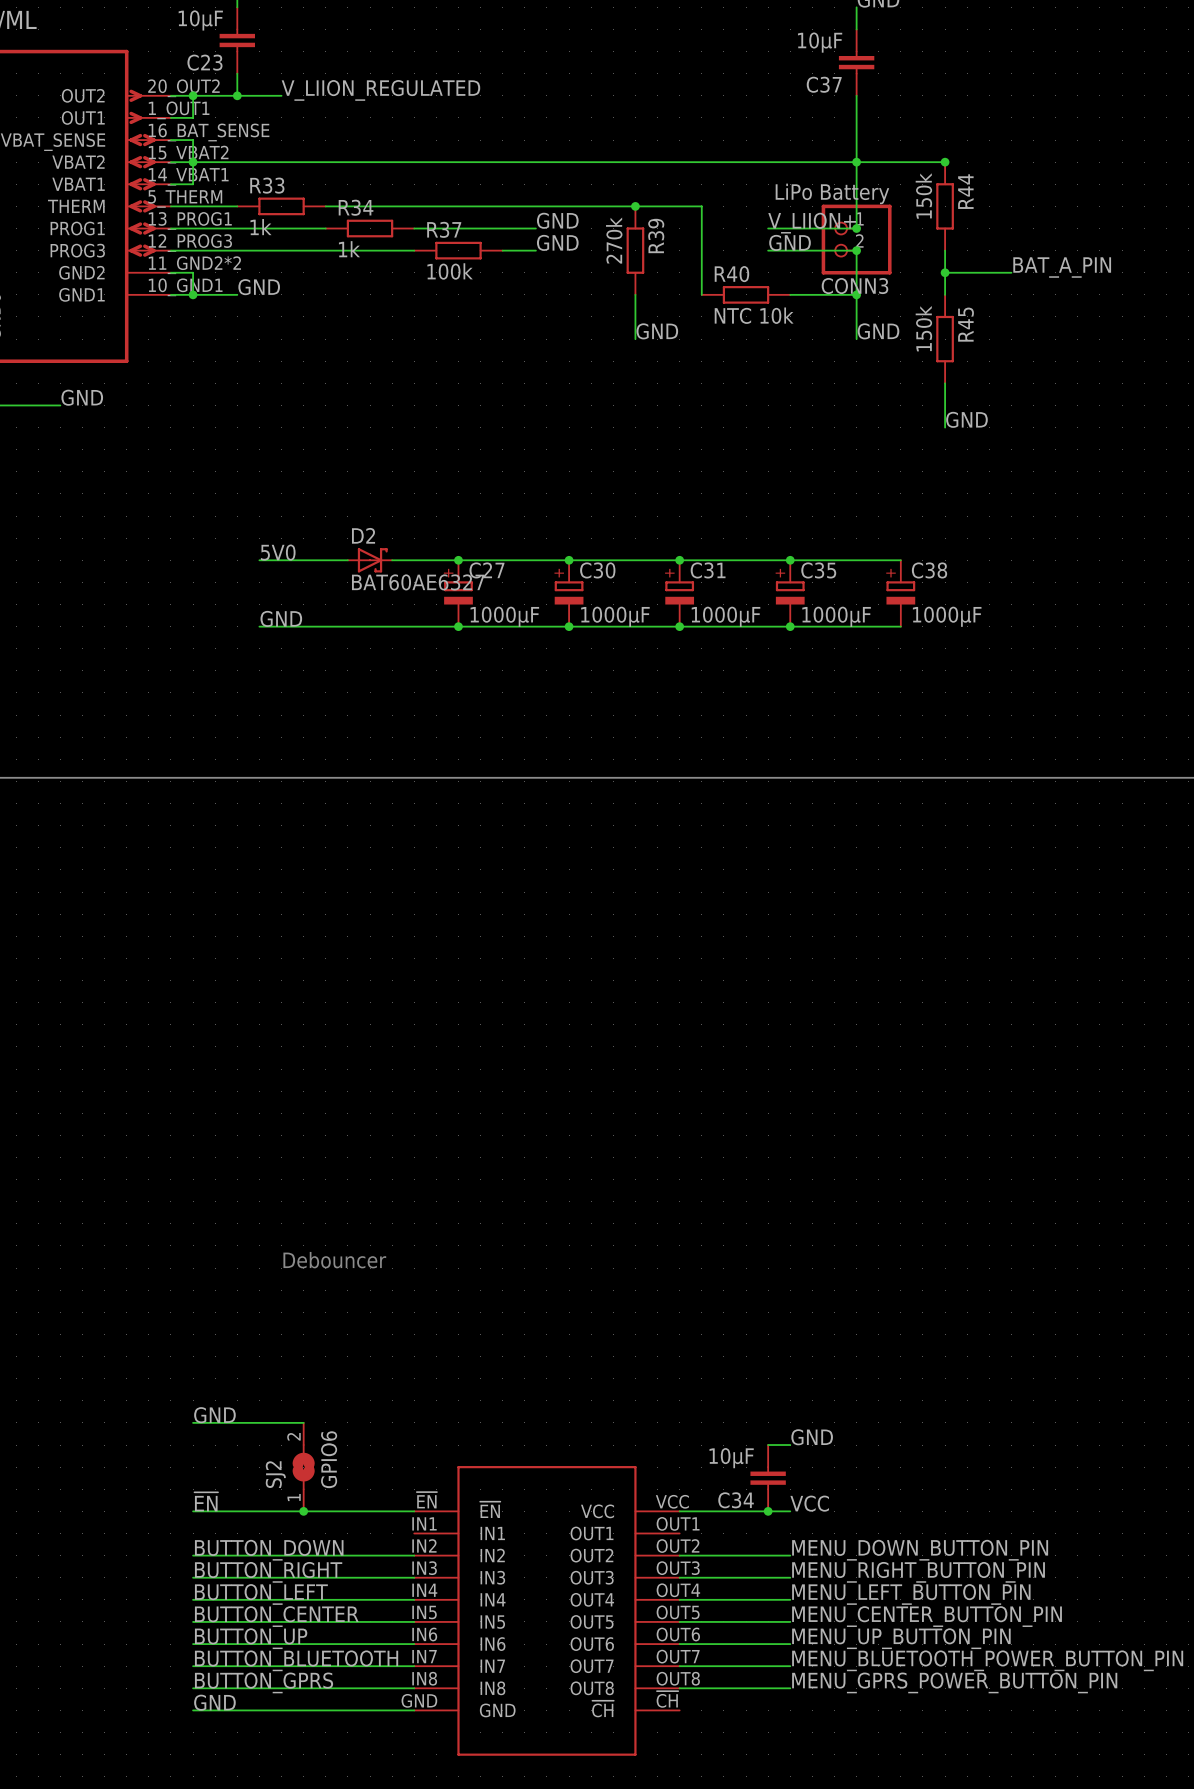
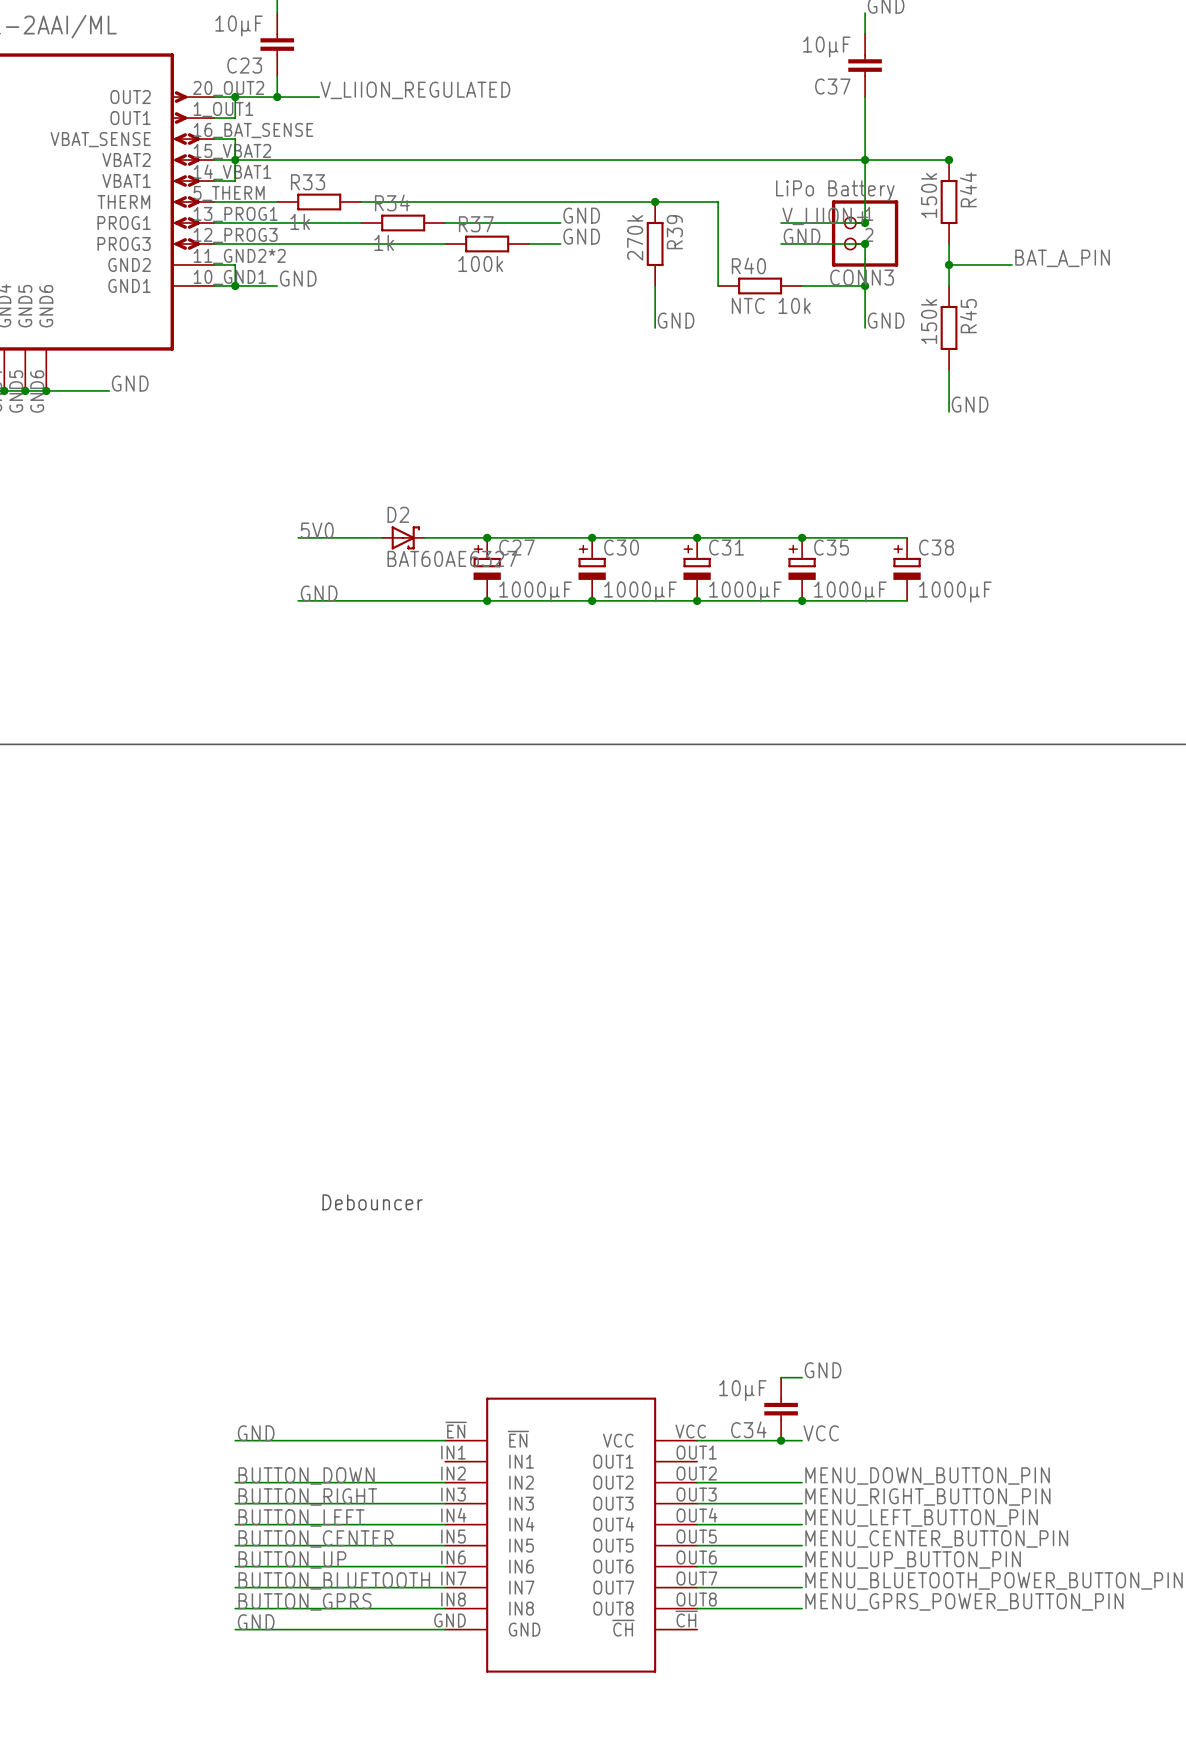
label: GND (214, 1415) -> none
wire: (193, 1422) (303, 1422) -> none
SJ2: GPIO6 (303, 1467) -> none
label: ~{EN} (206, 1501) -> GND (256, 1433)
junction: (303, 1511) -> none

